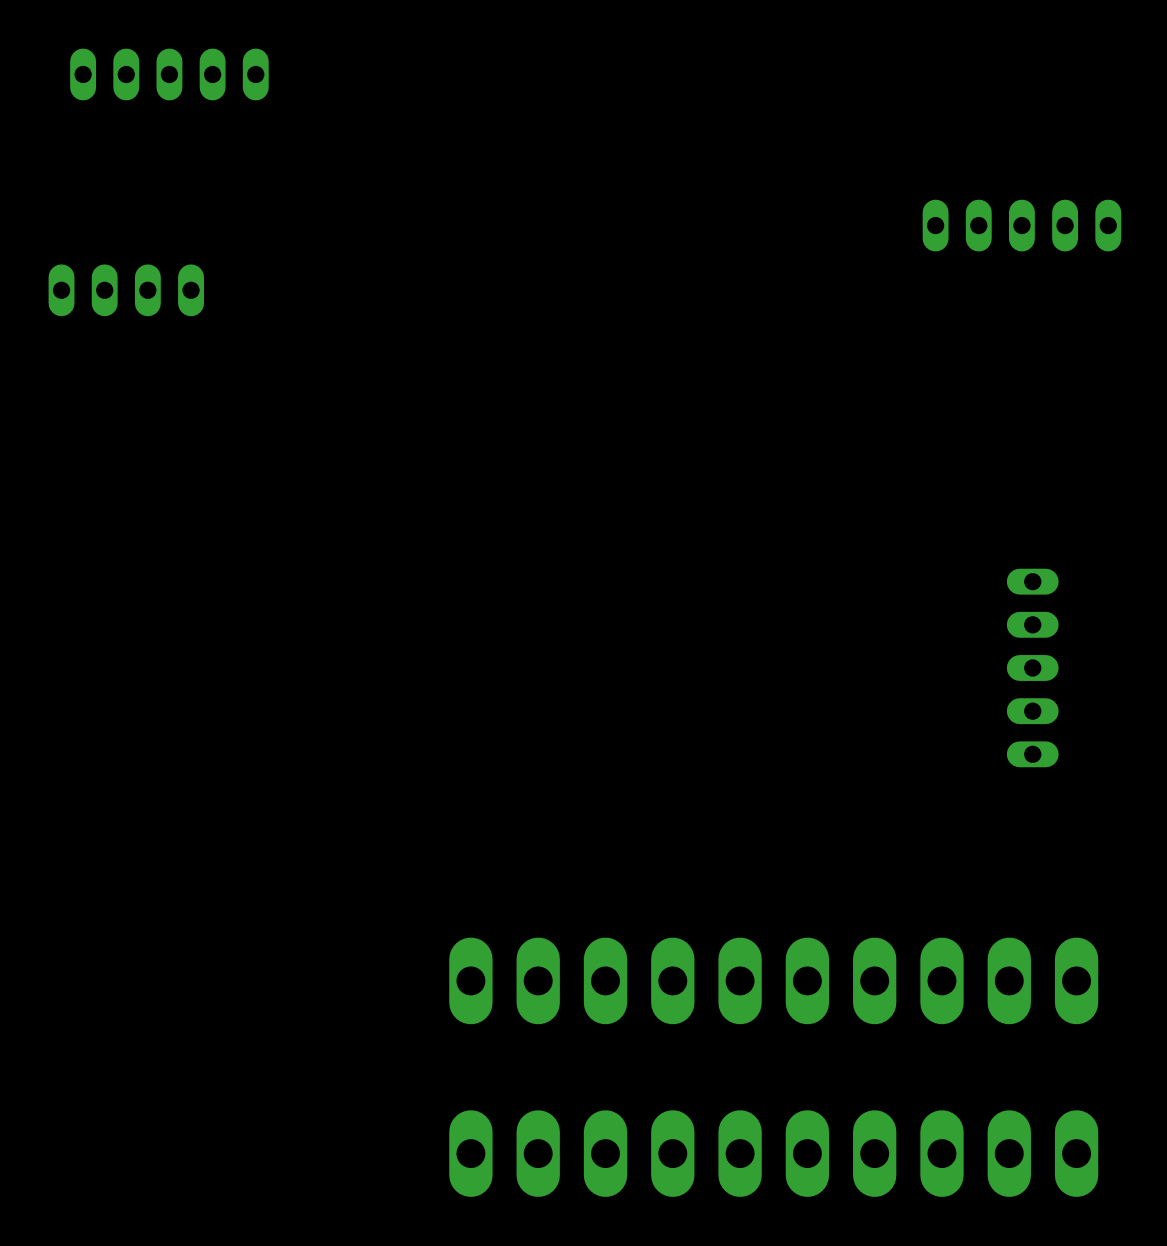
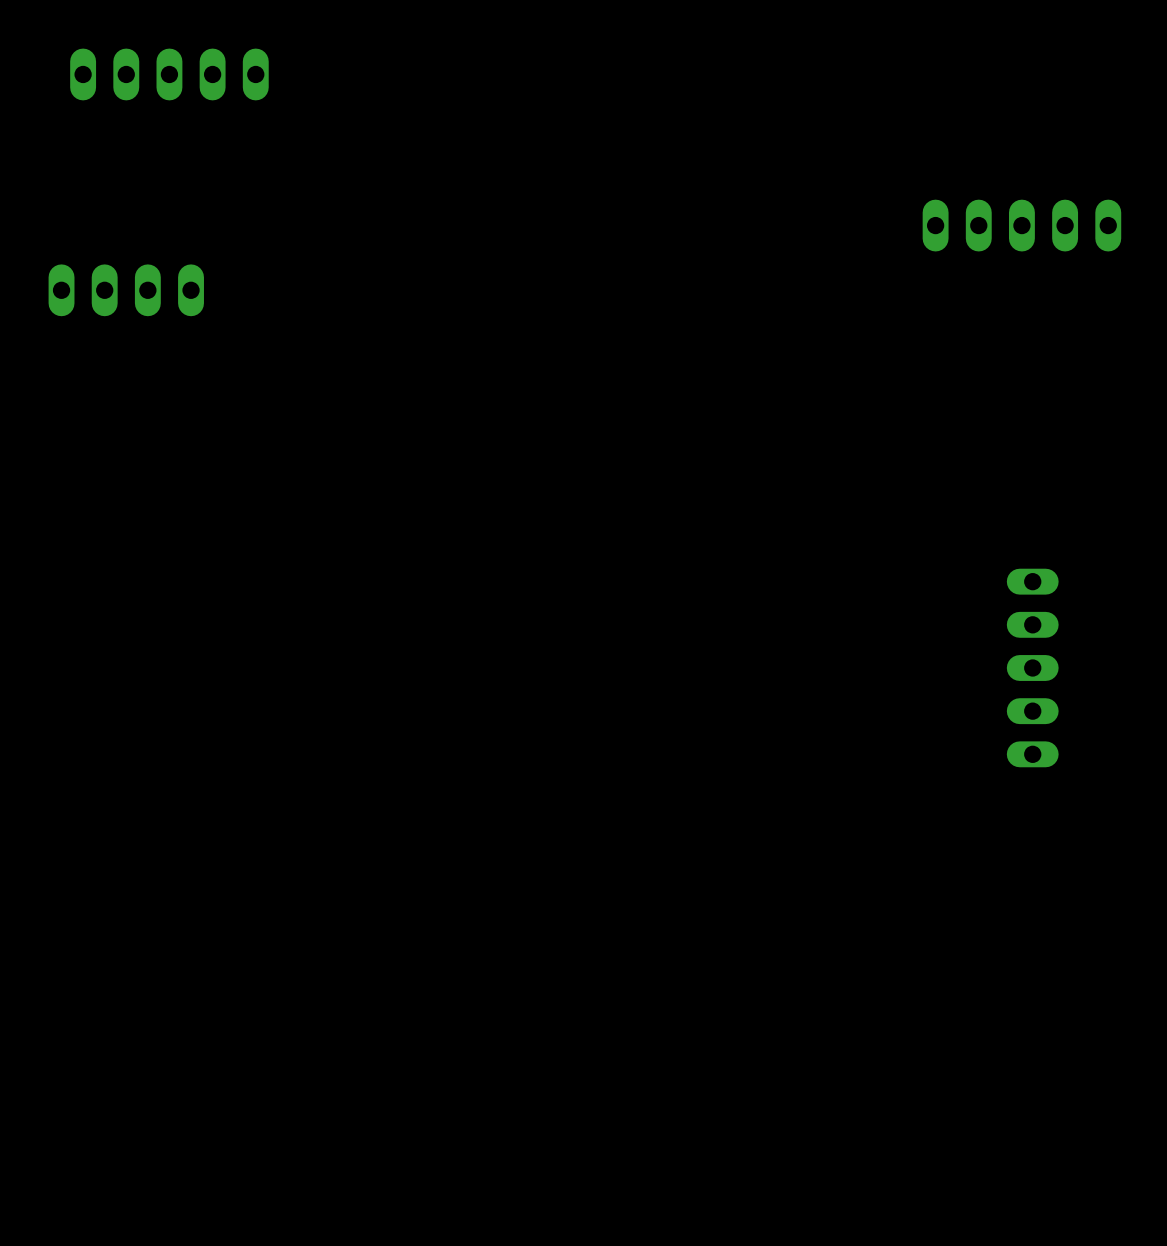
part: (773, 980) -> none
part: (773, 1153) -> none

